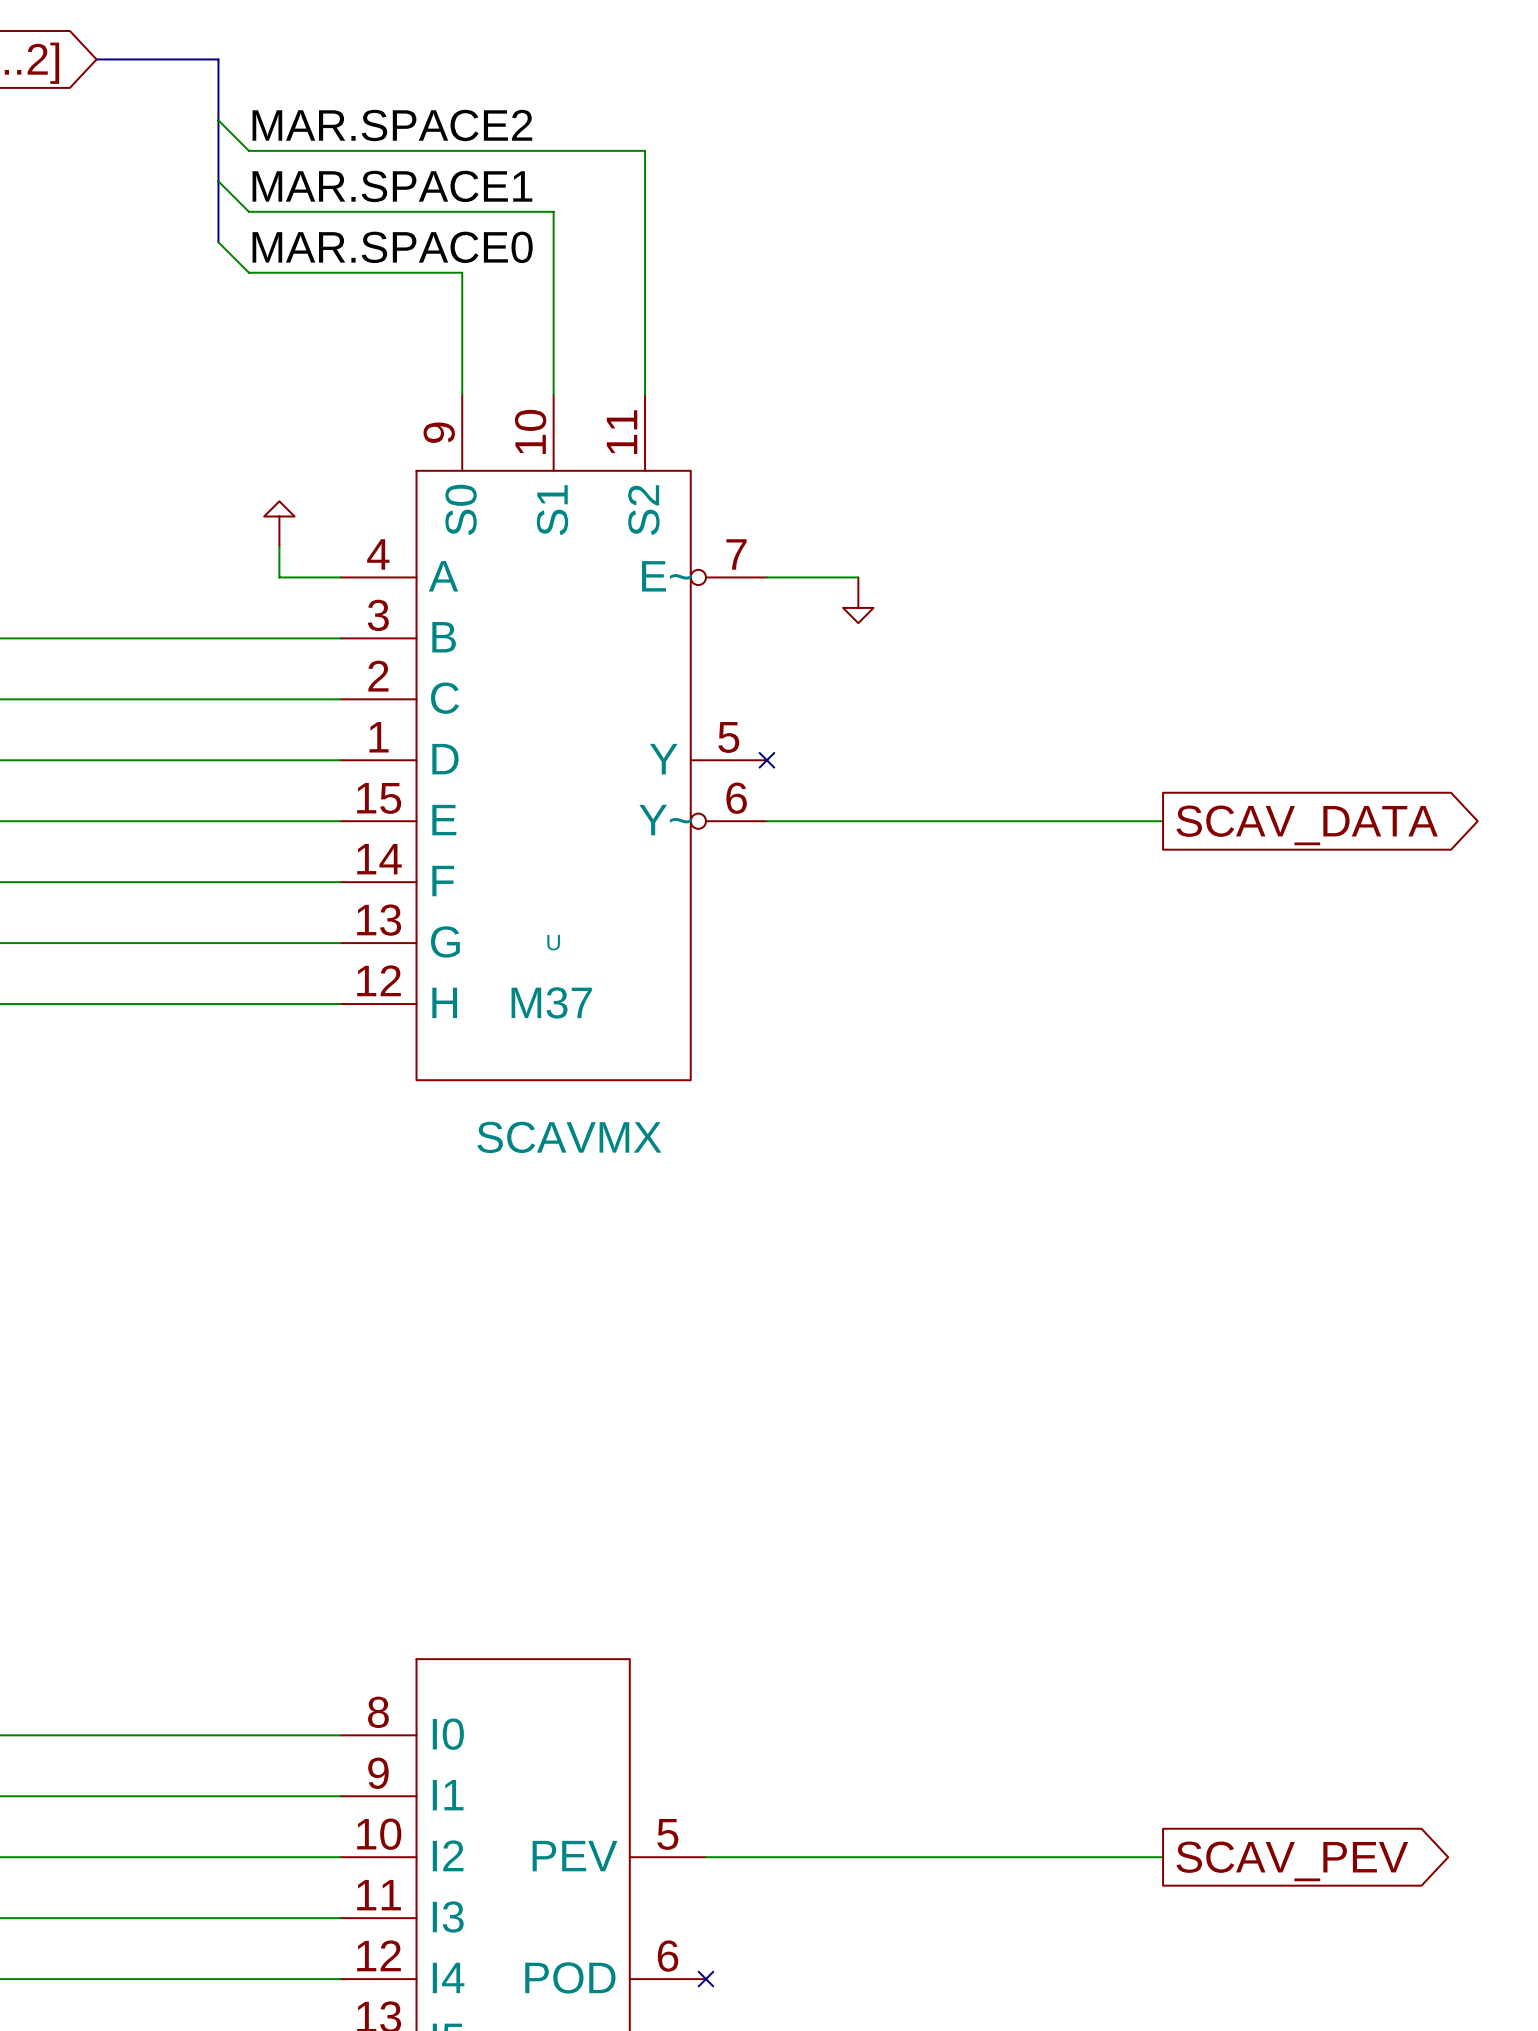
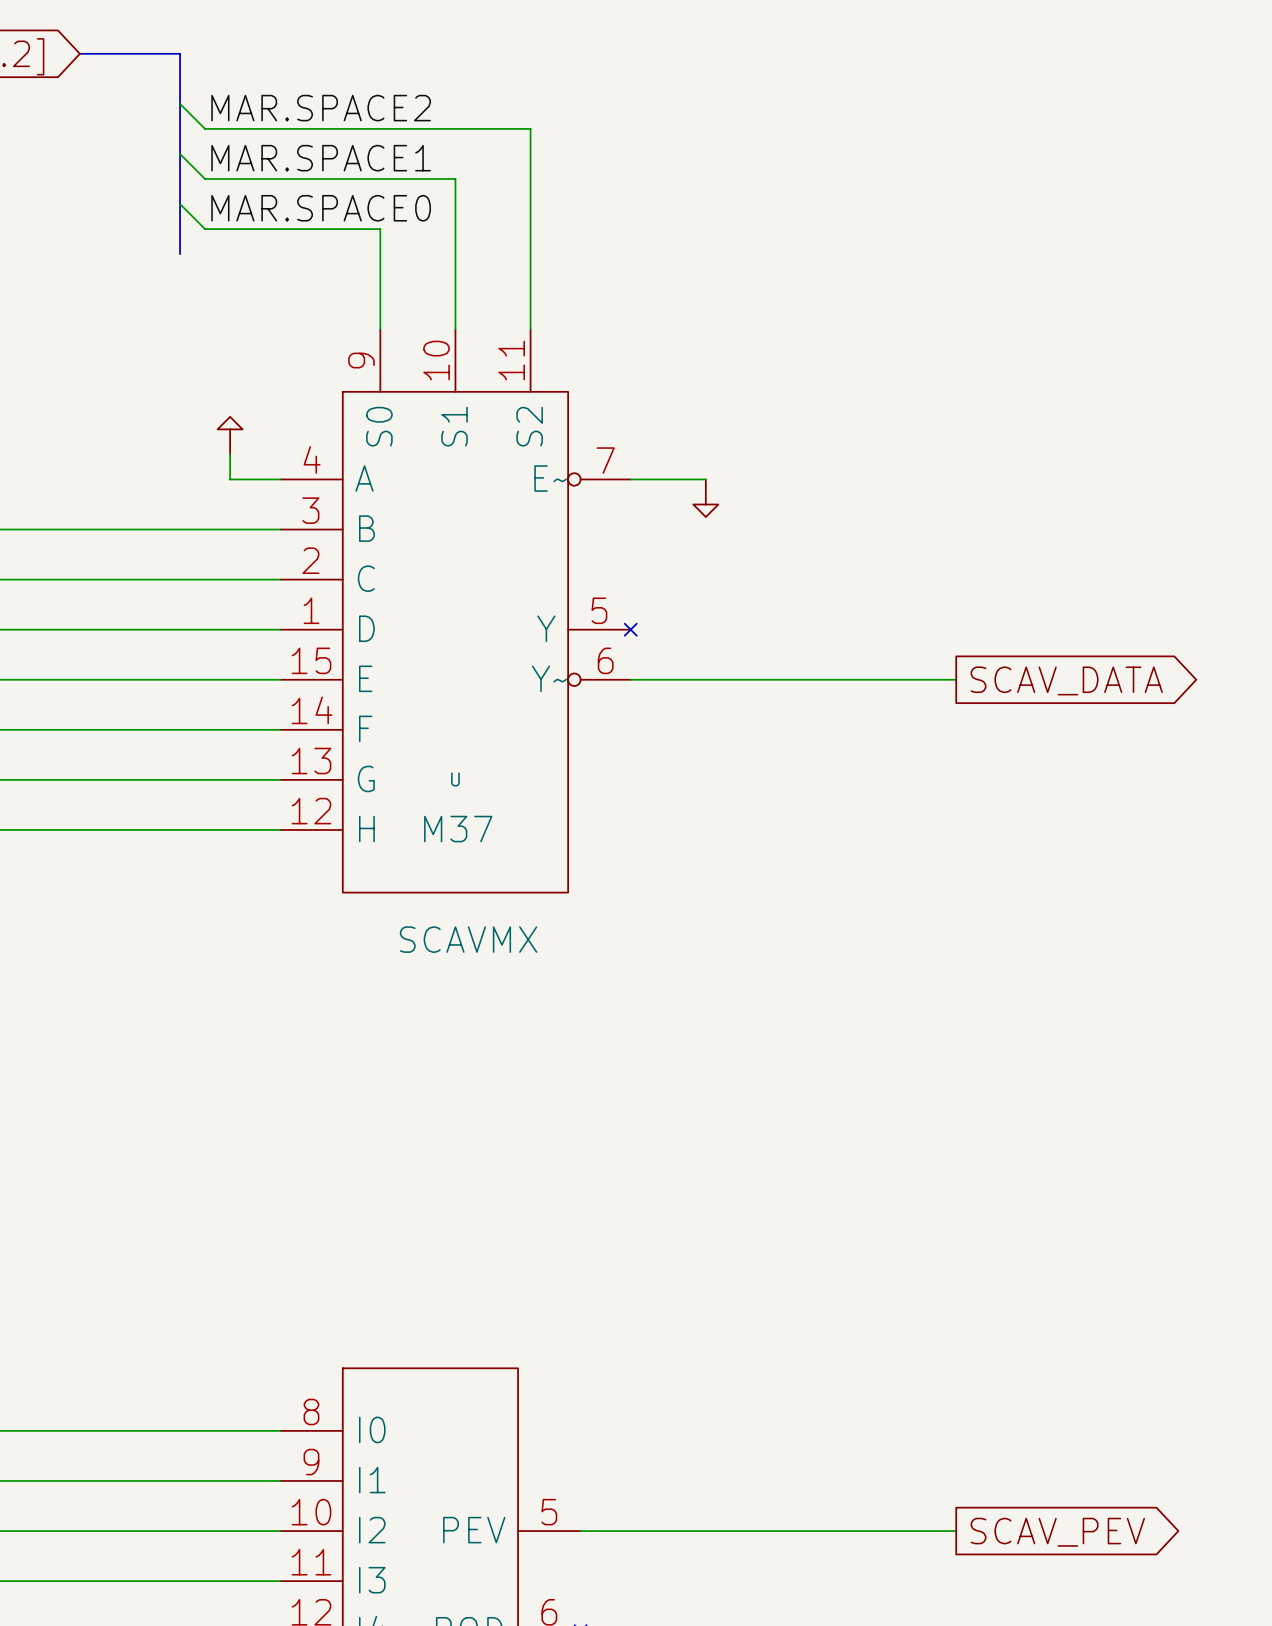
bus: none -> (180, 204) (180, 254)

